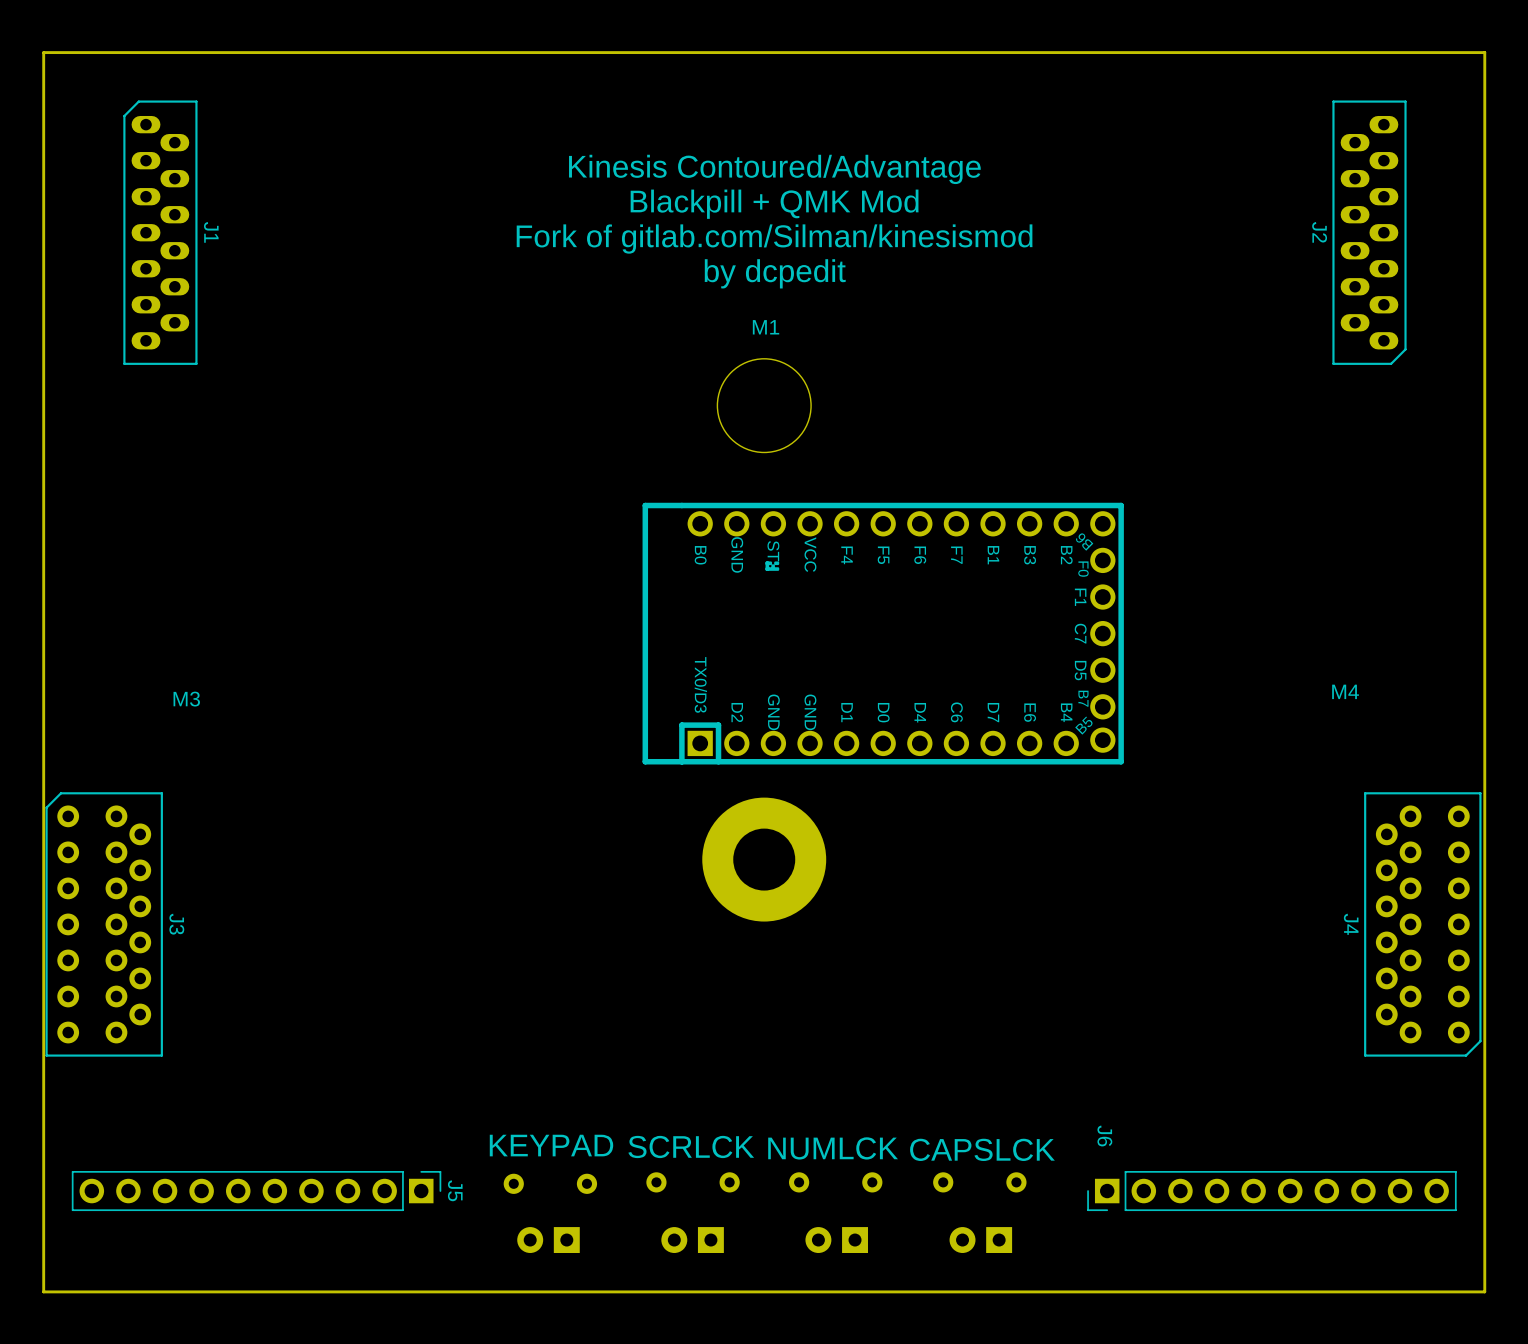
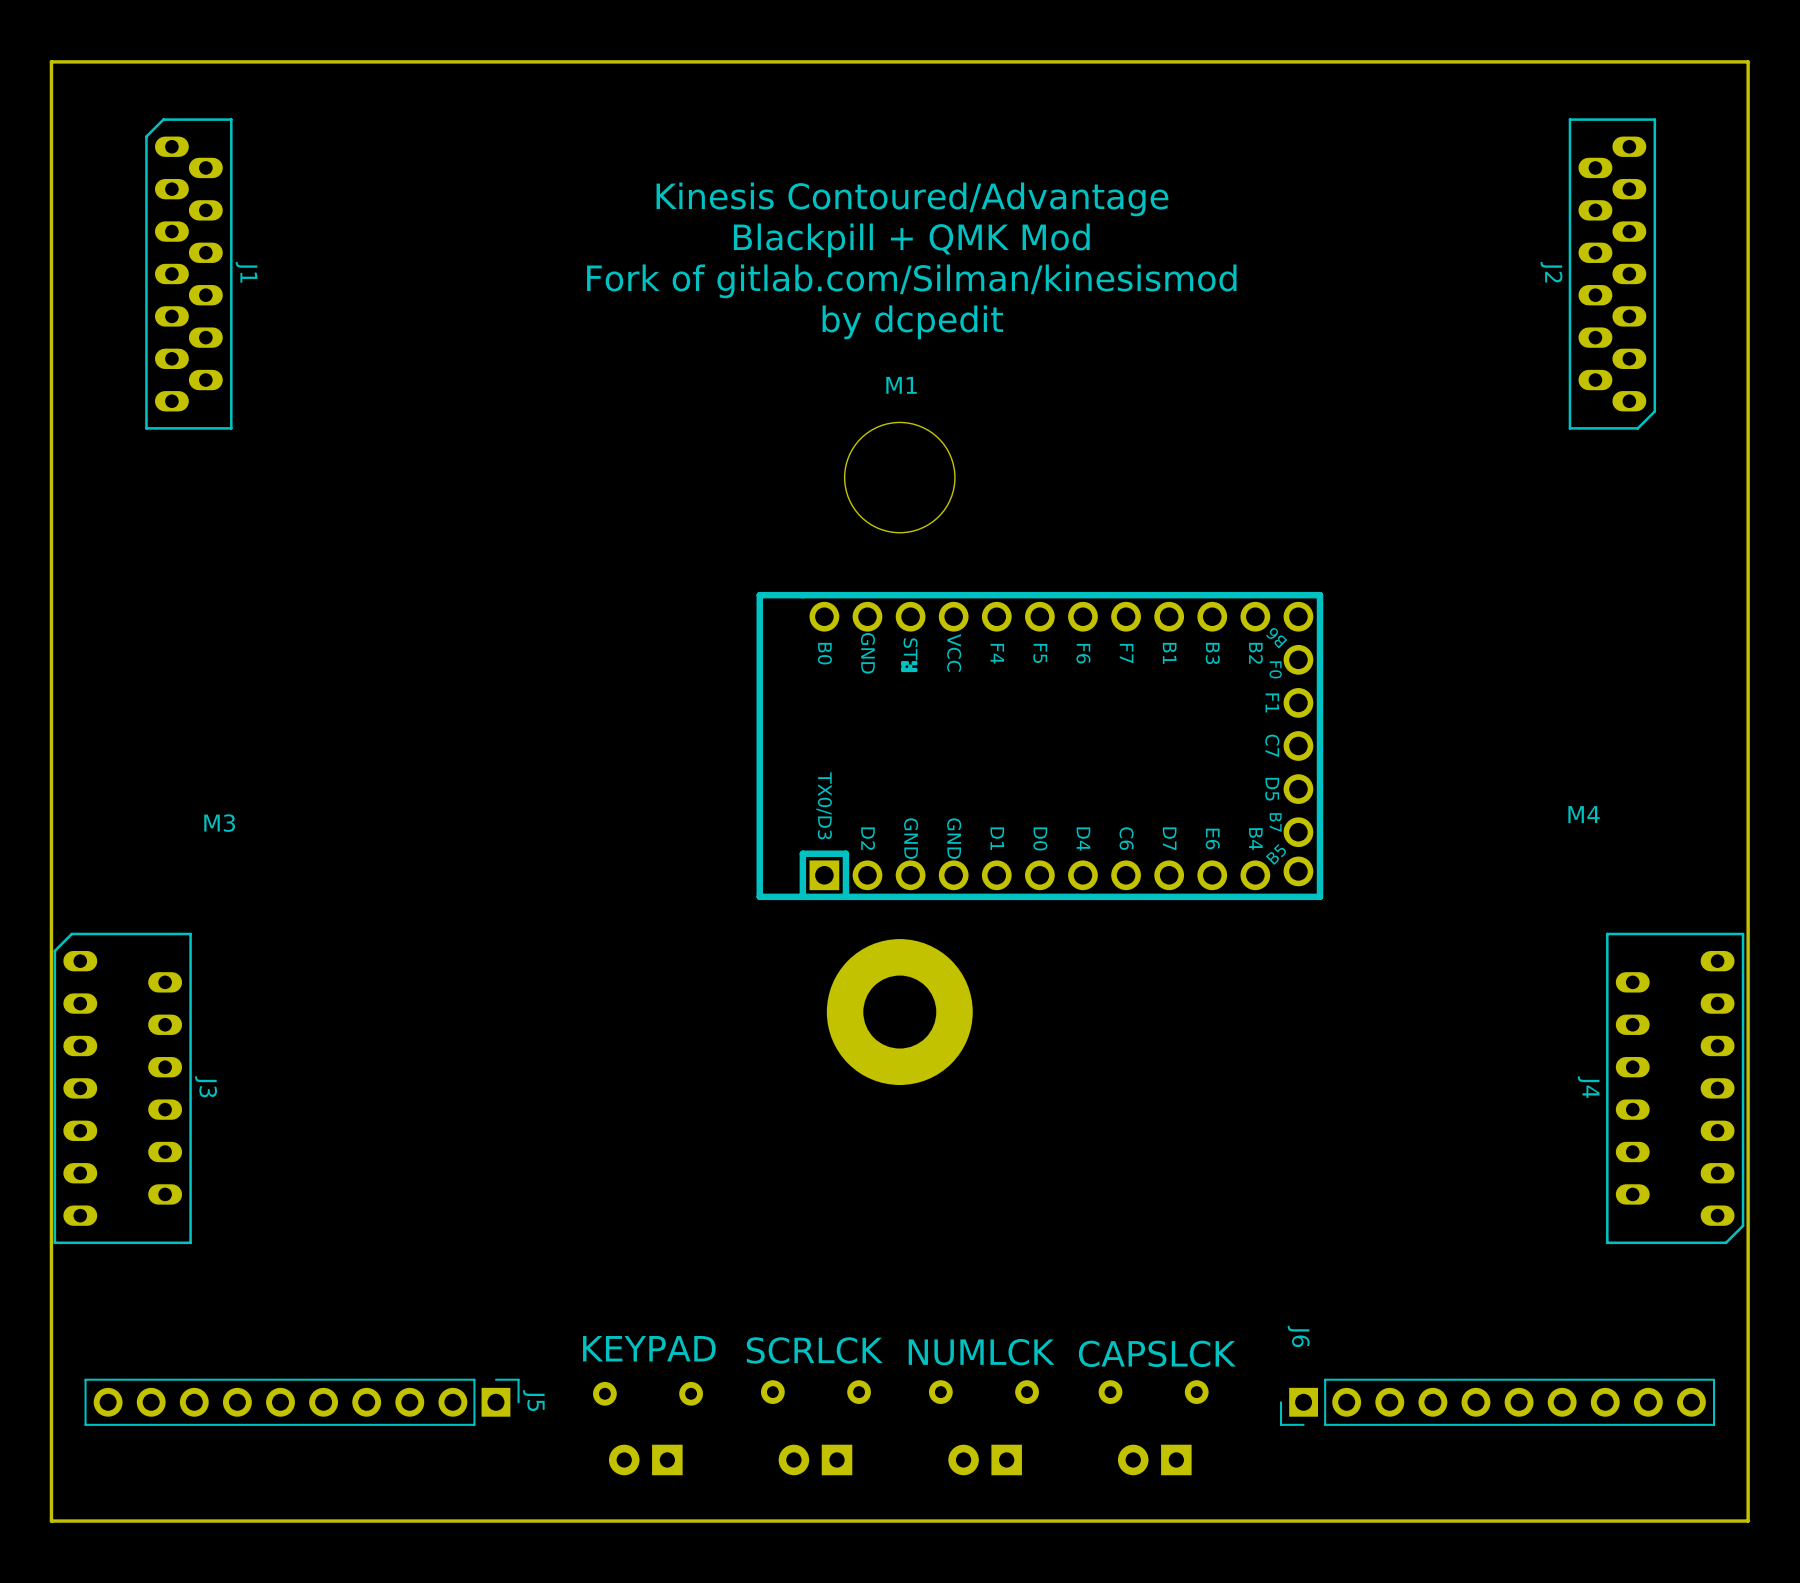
J3 footprint: [45, 792, 163, 1057] -> [53, 932, 192, 1245]
J4 footprint: [1364, 792, 1482, 1057] -> [1606, 932, 1745, 1245]

